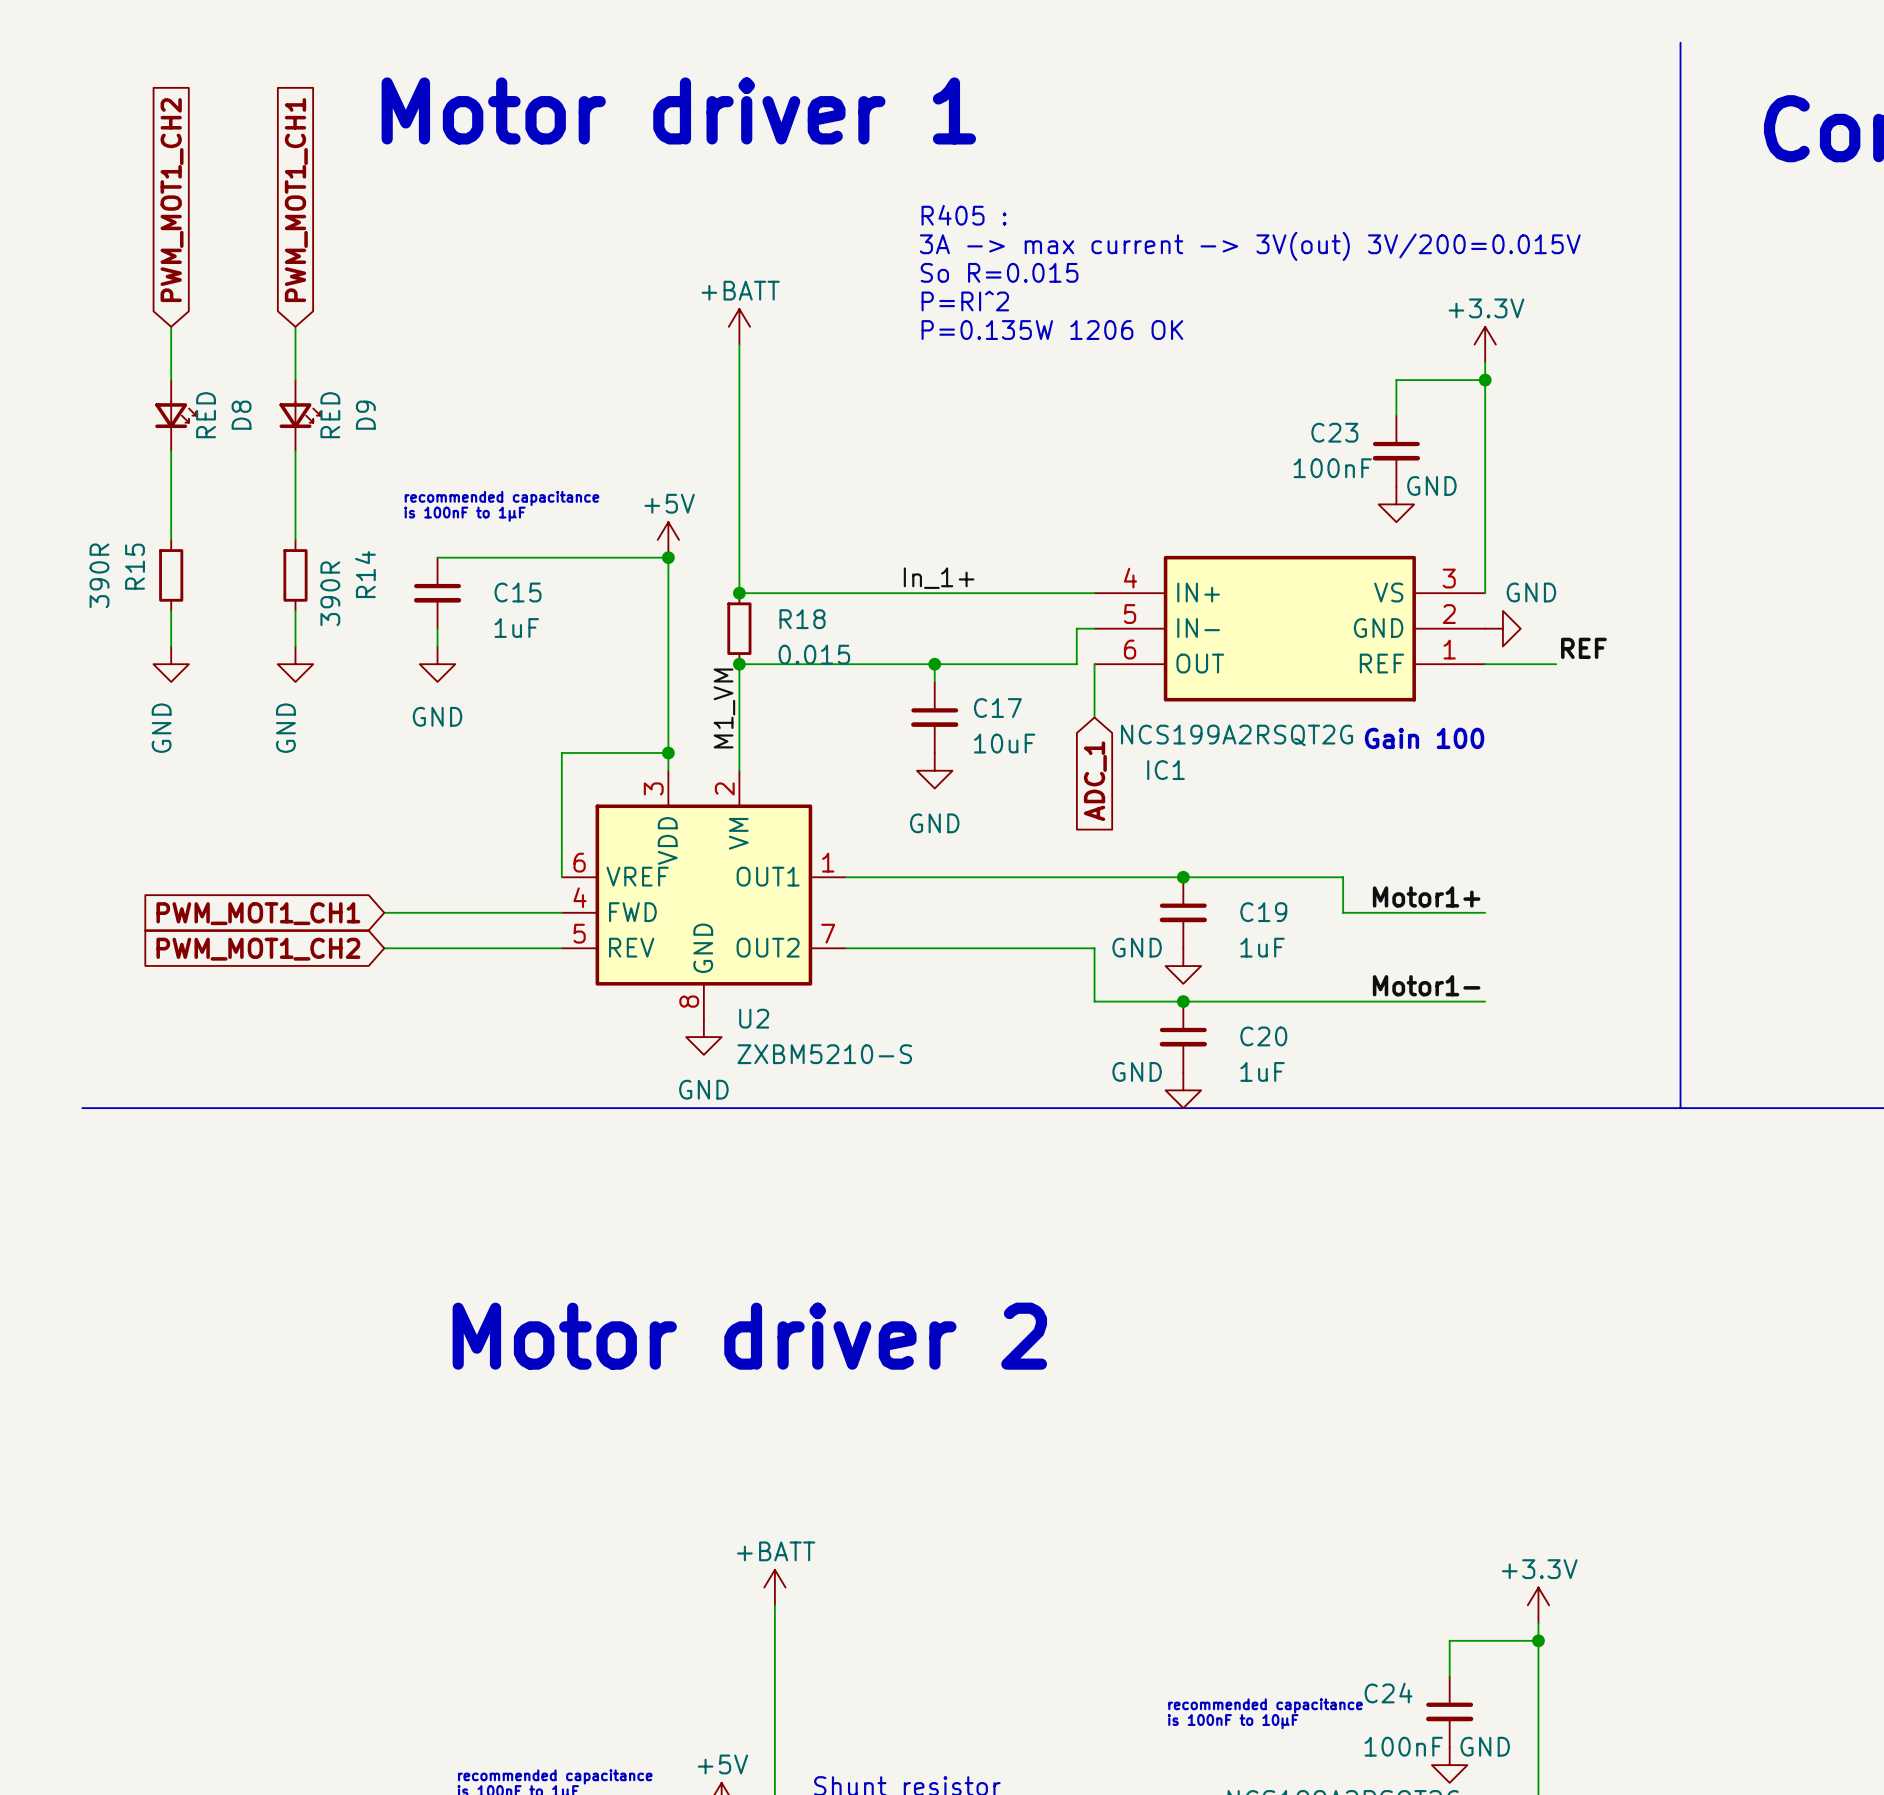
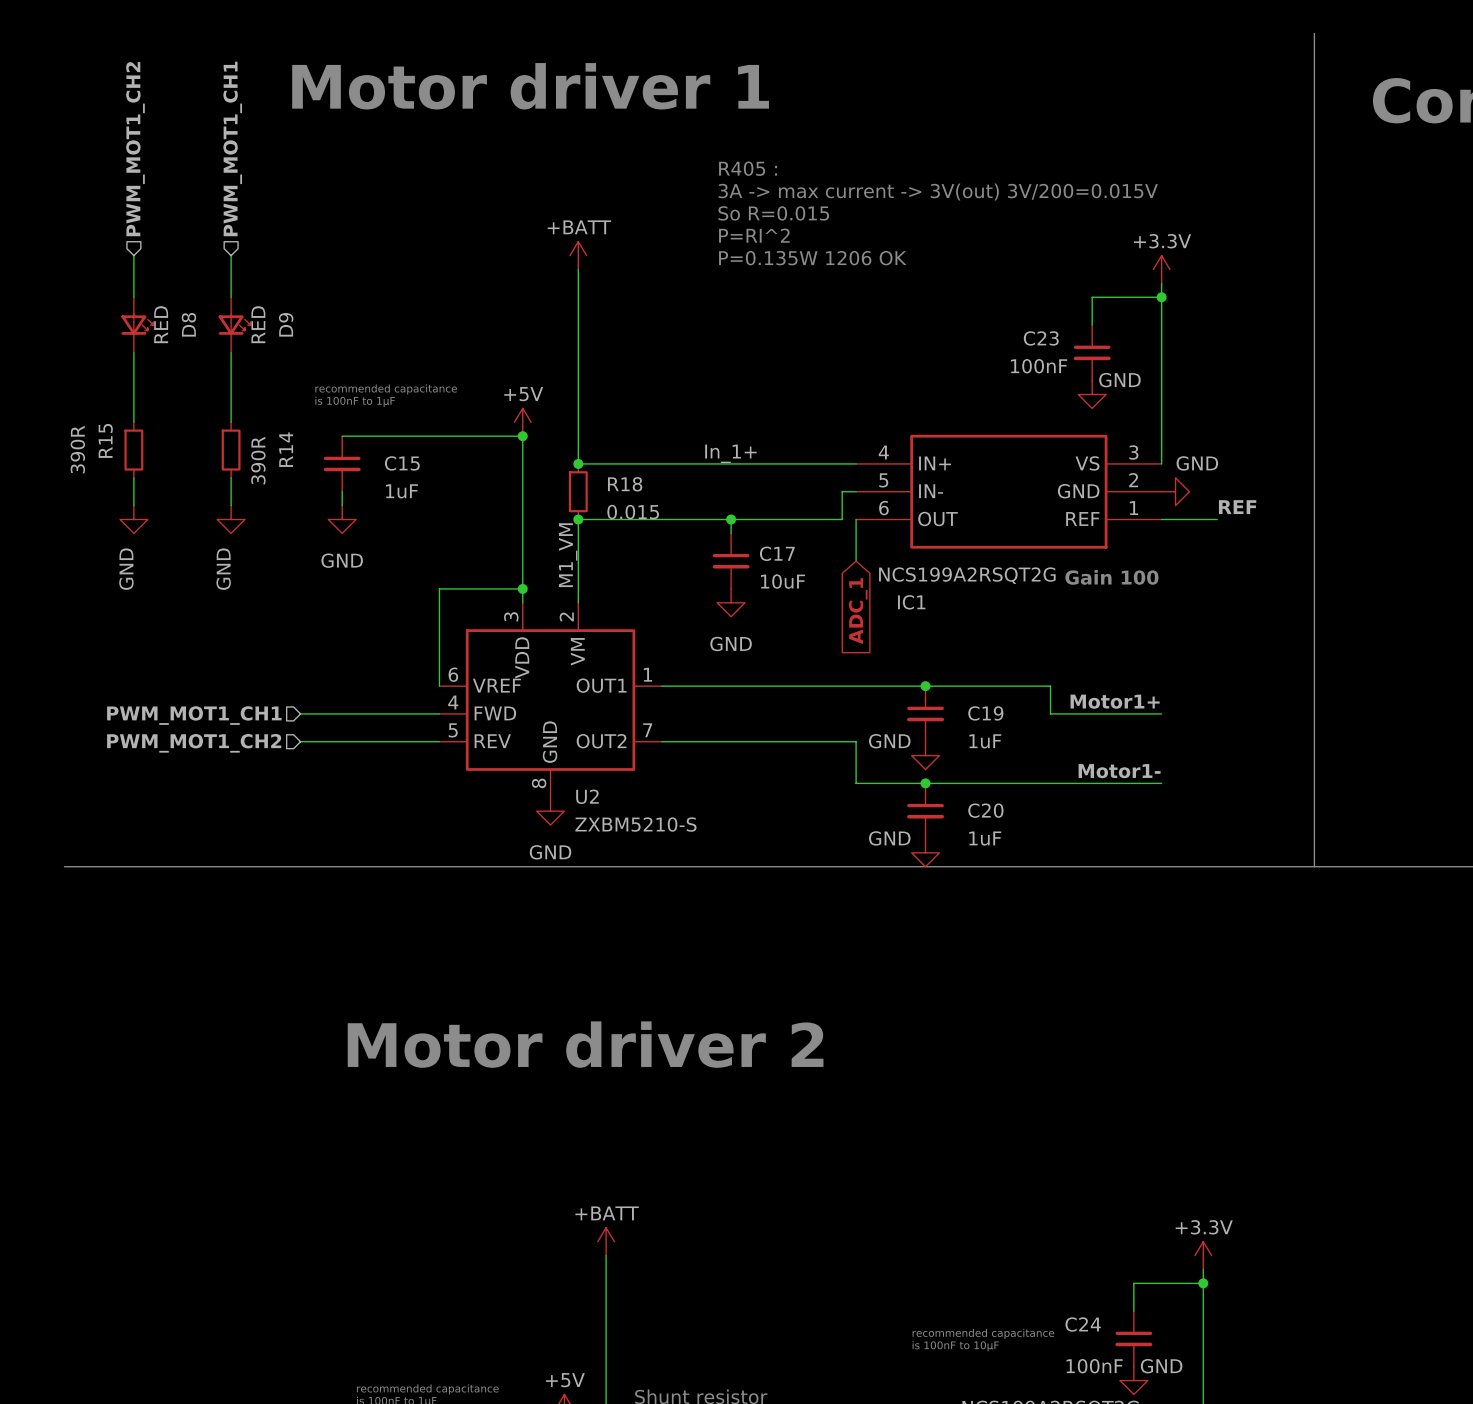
hierarchical label: none -> PWM_MOT1_CH2 (135, 149)
hierarchical label: none -> PWM_MOT1_CH1 (232, 148)
global label: PWM_MOT1_CH2 (172, 200) -> none
global label: PWM_MOT1_CH1 (296, 200) -> none
hierarchical label: none -> PWM_MOT1_CH1 (194, 715)
global label: PWM_MOT1_CH1 (258, 913) -> none
hierarchical label: none -> PWM_MOT1_CH2 (194, 743)
global label: PWM_MOT1_CH2 (258, 949) -> none

